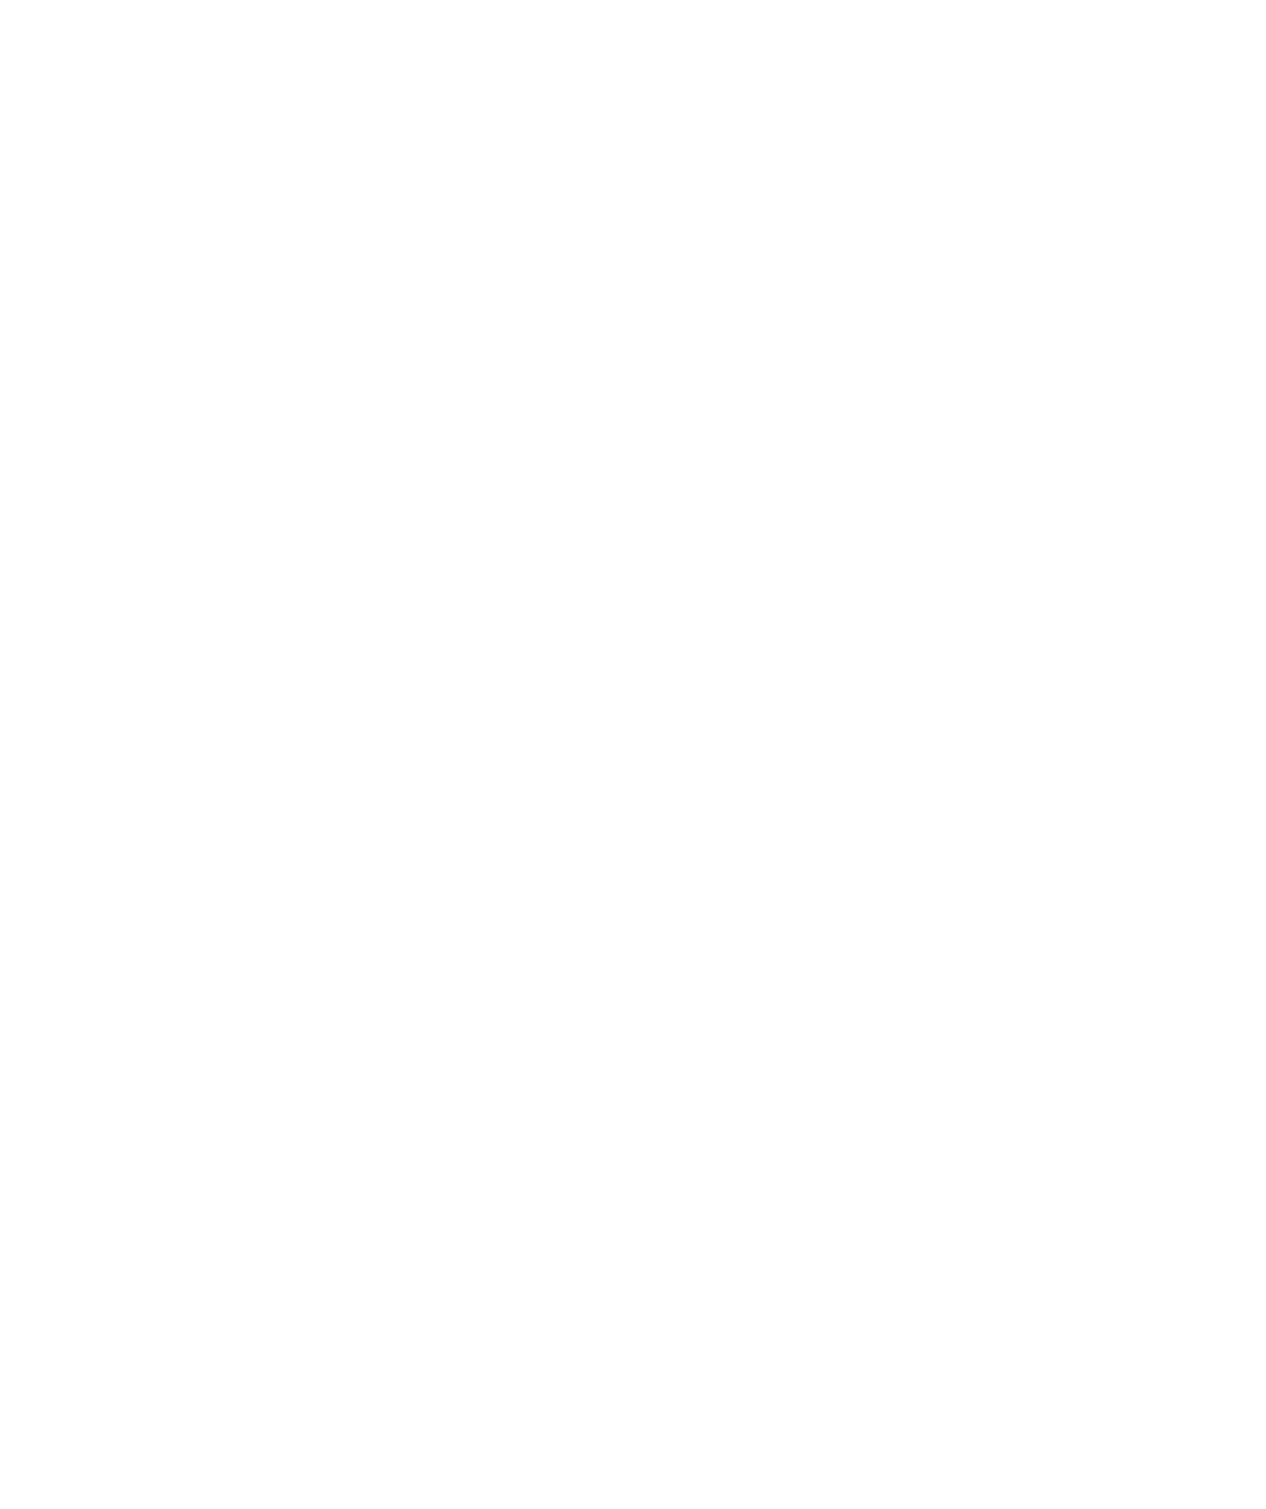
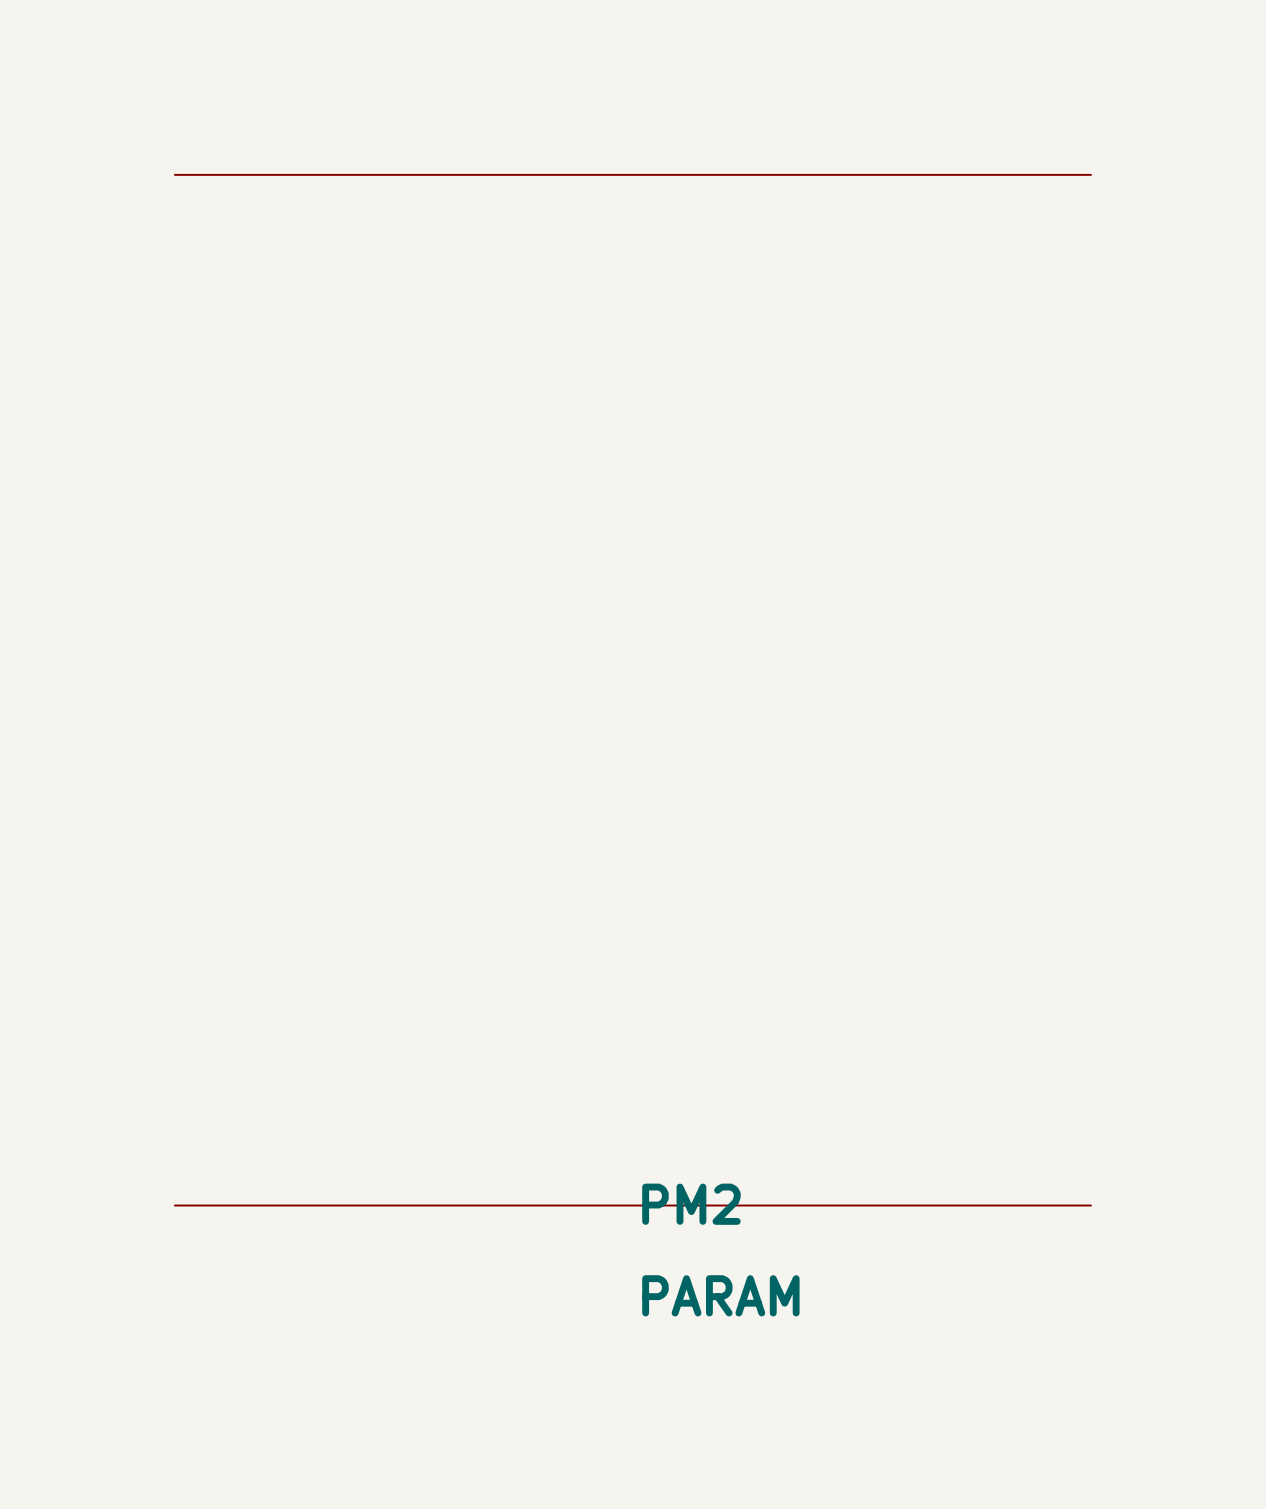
part: none -> (632, 174)
PM2: none -> PARAM (632, 1205)

